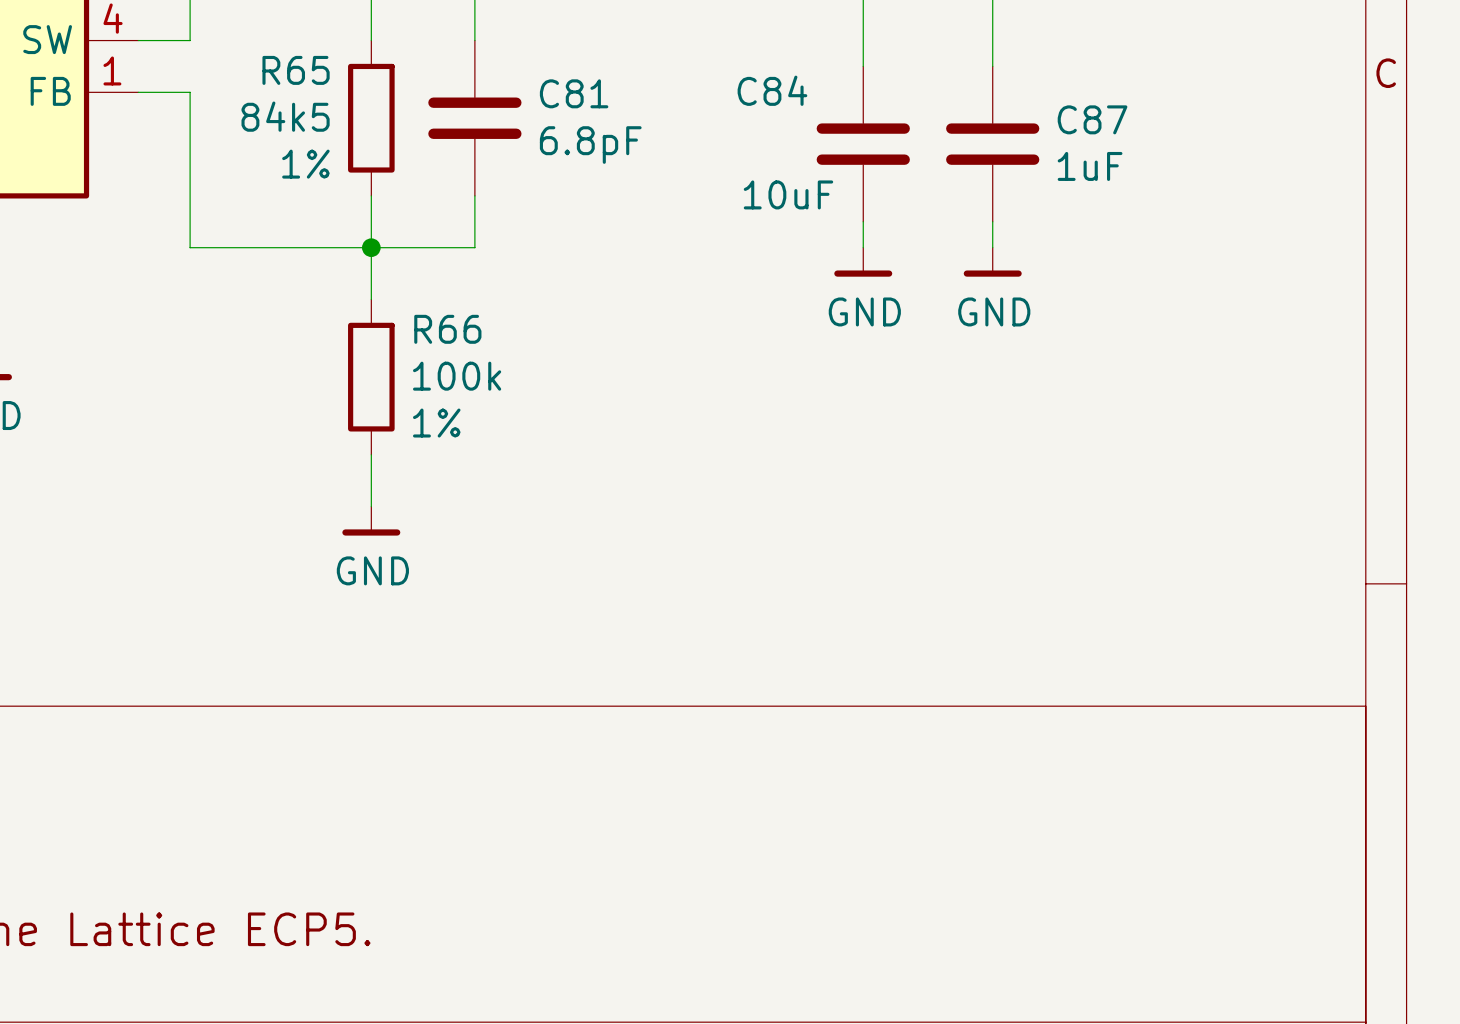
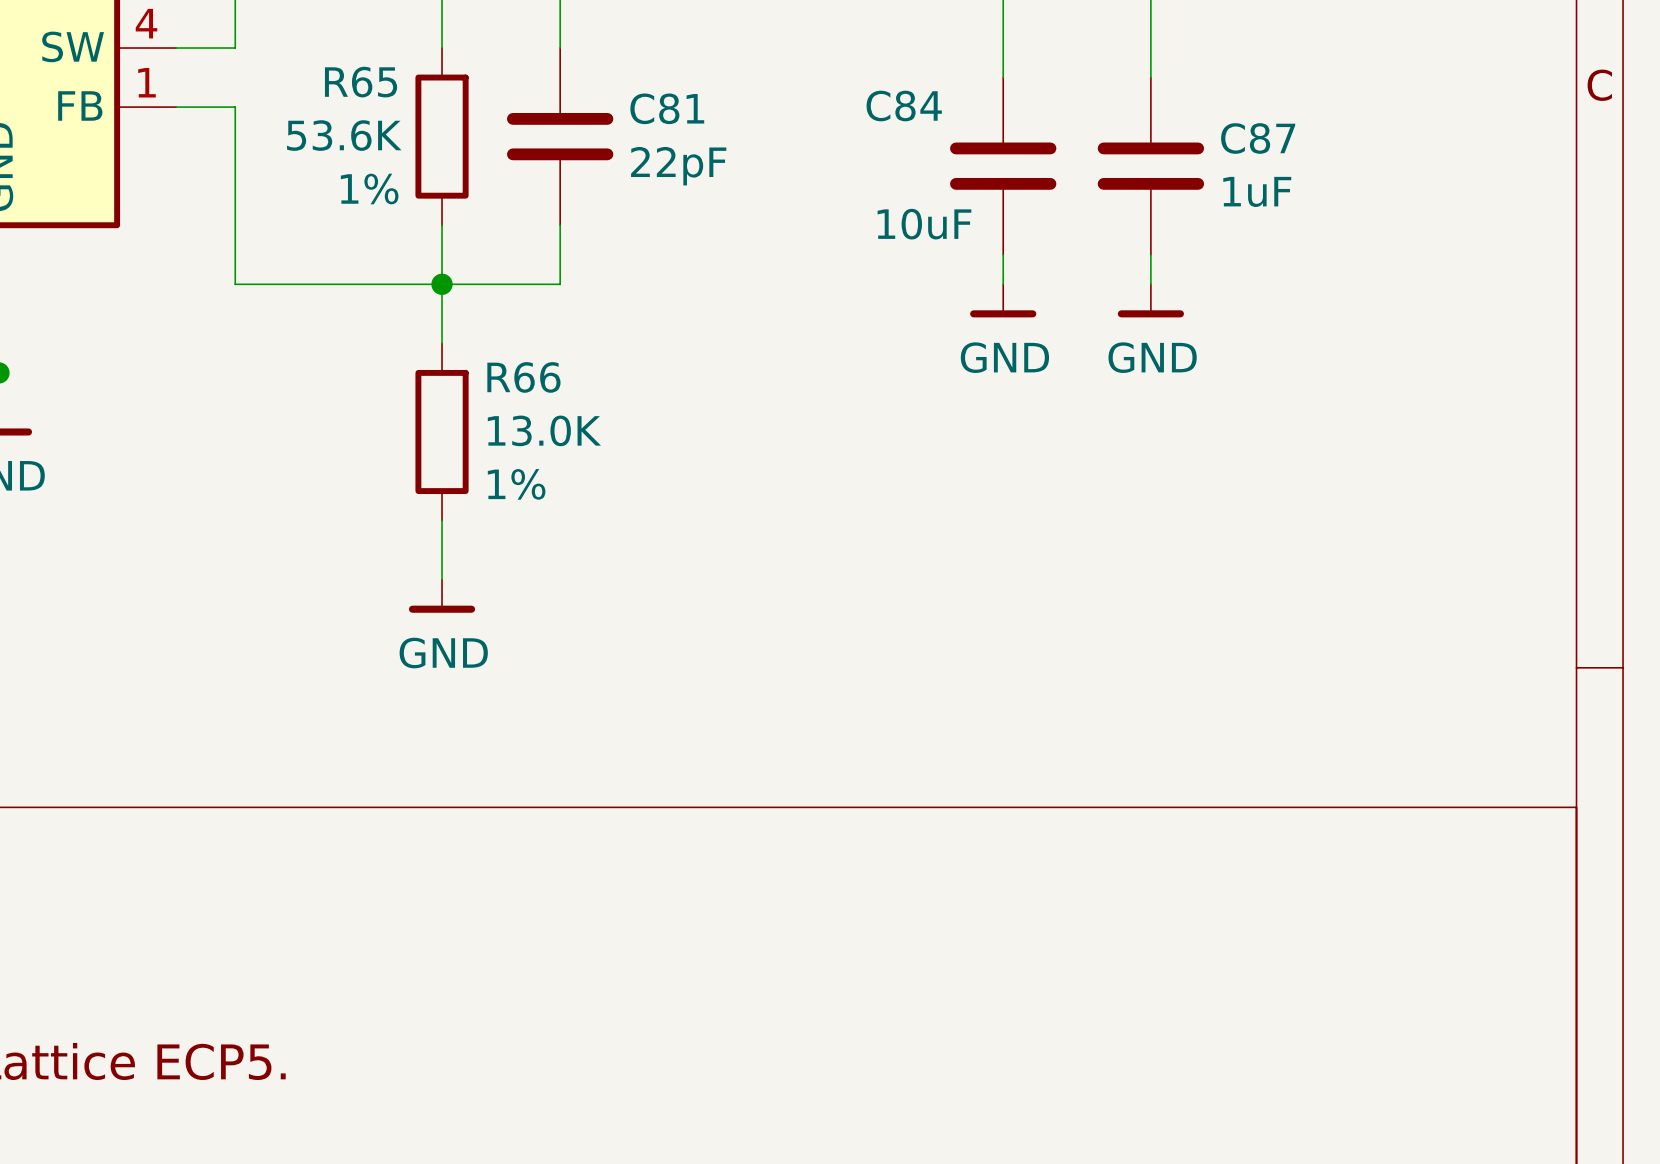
R65 value: 84k5 (285, 116) -> 53.6K (344, 135)
C81 value: 6.8pF (590, 145) -> 22pF (678, 166)
R66 value: 100k (457, 376) -> 13.0K (544, 430)

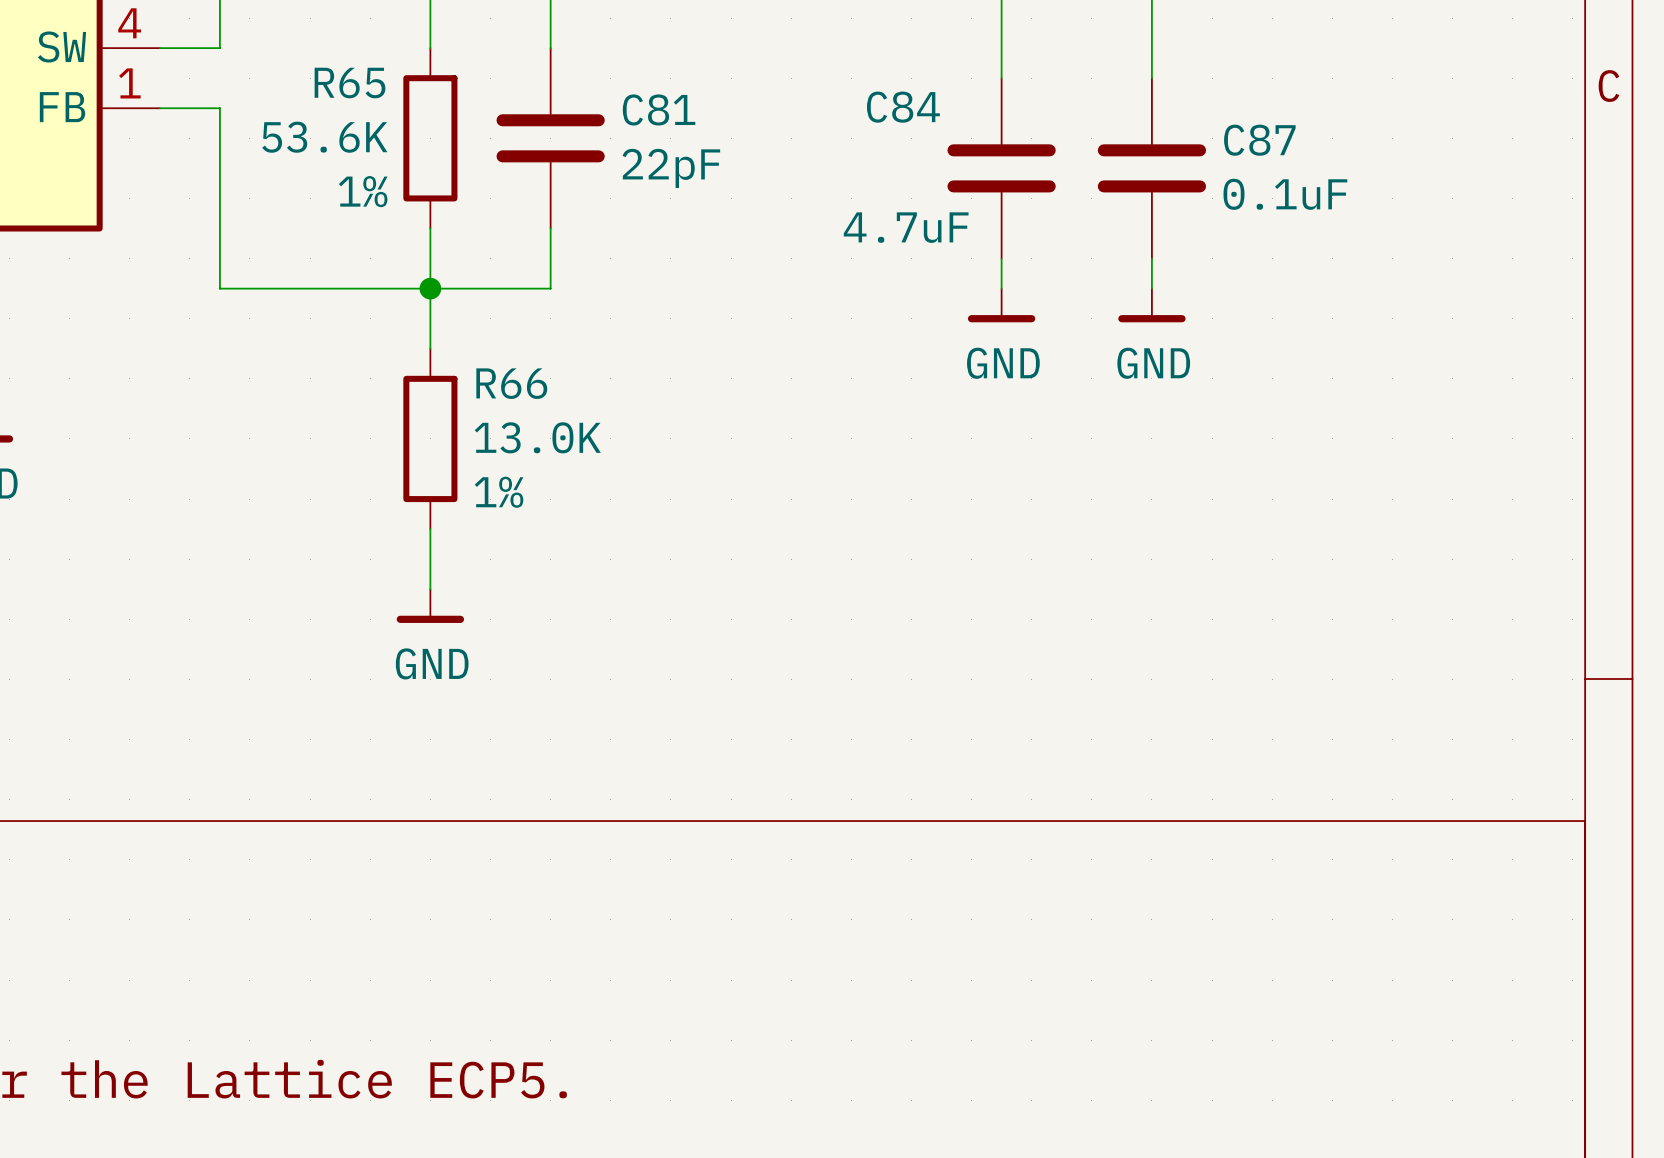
C87 value: 1uF (1257, 191) -> 0.1uF (1285, 194)
C84 value: 10uF (924, 224) -> 4.7uF (906, 227)

